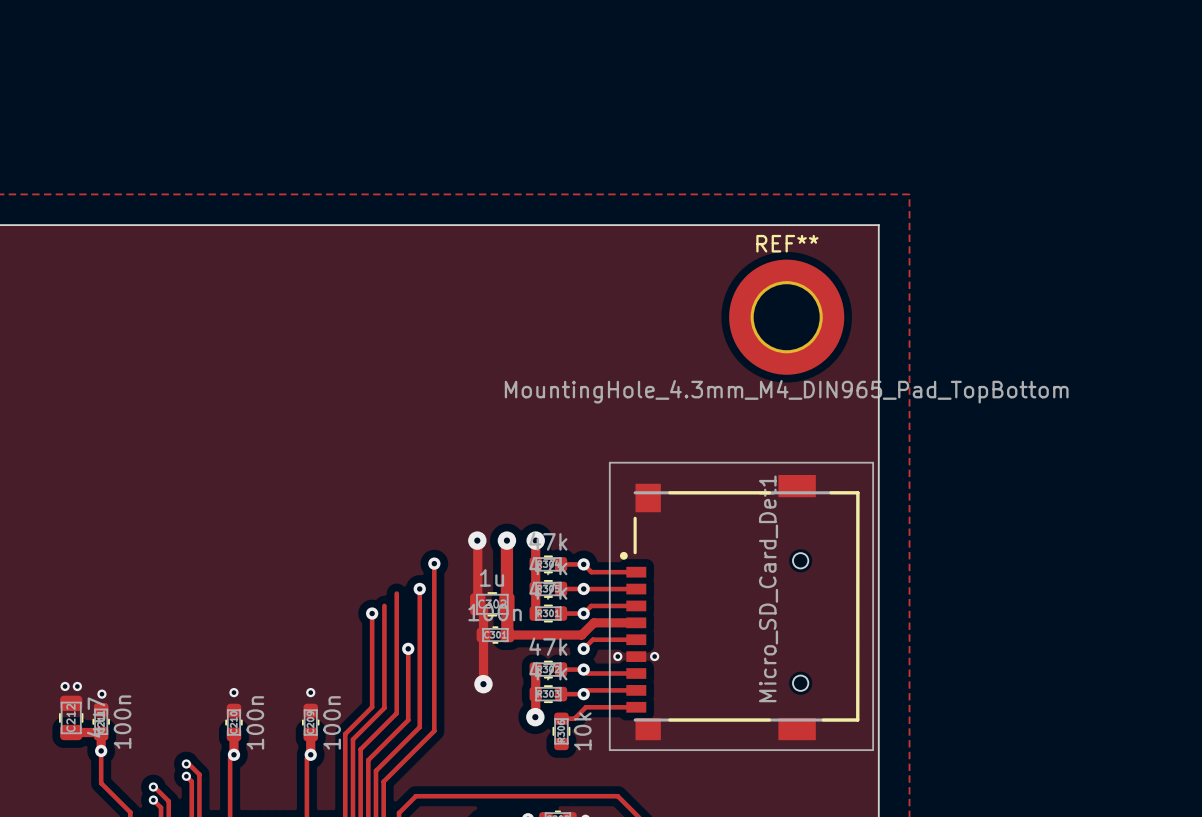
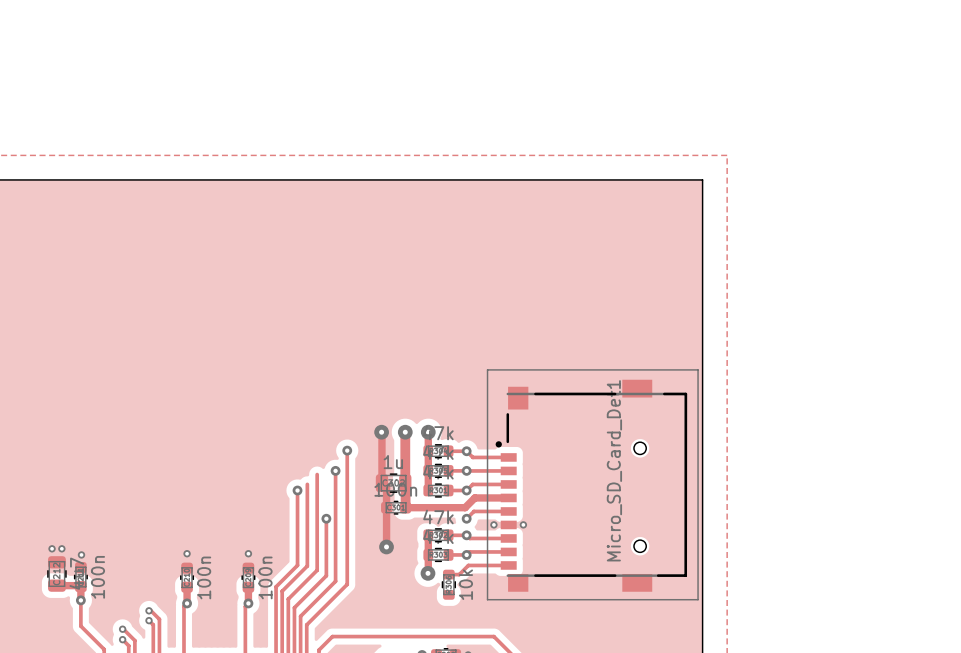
REF**: MountingHole_4.3mm_M4_DIN965_Pad_TopBottom (786, 317) -> none

